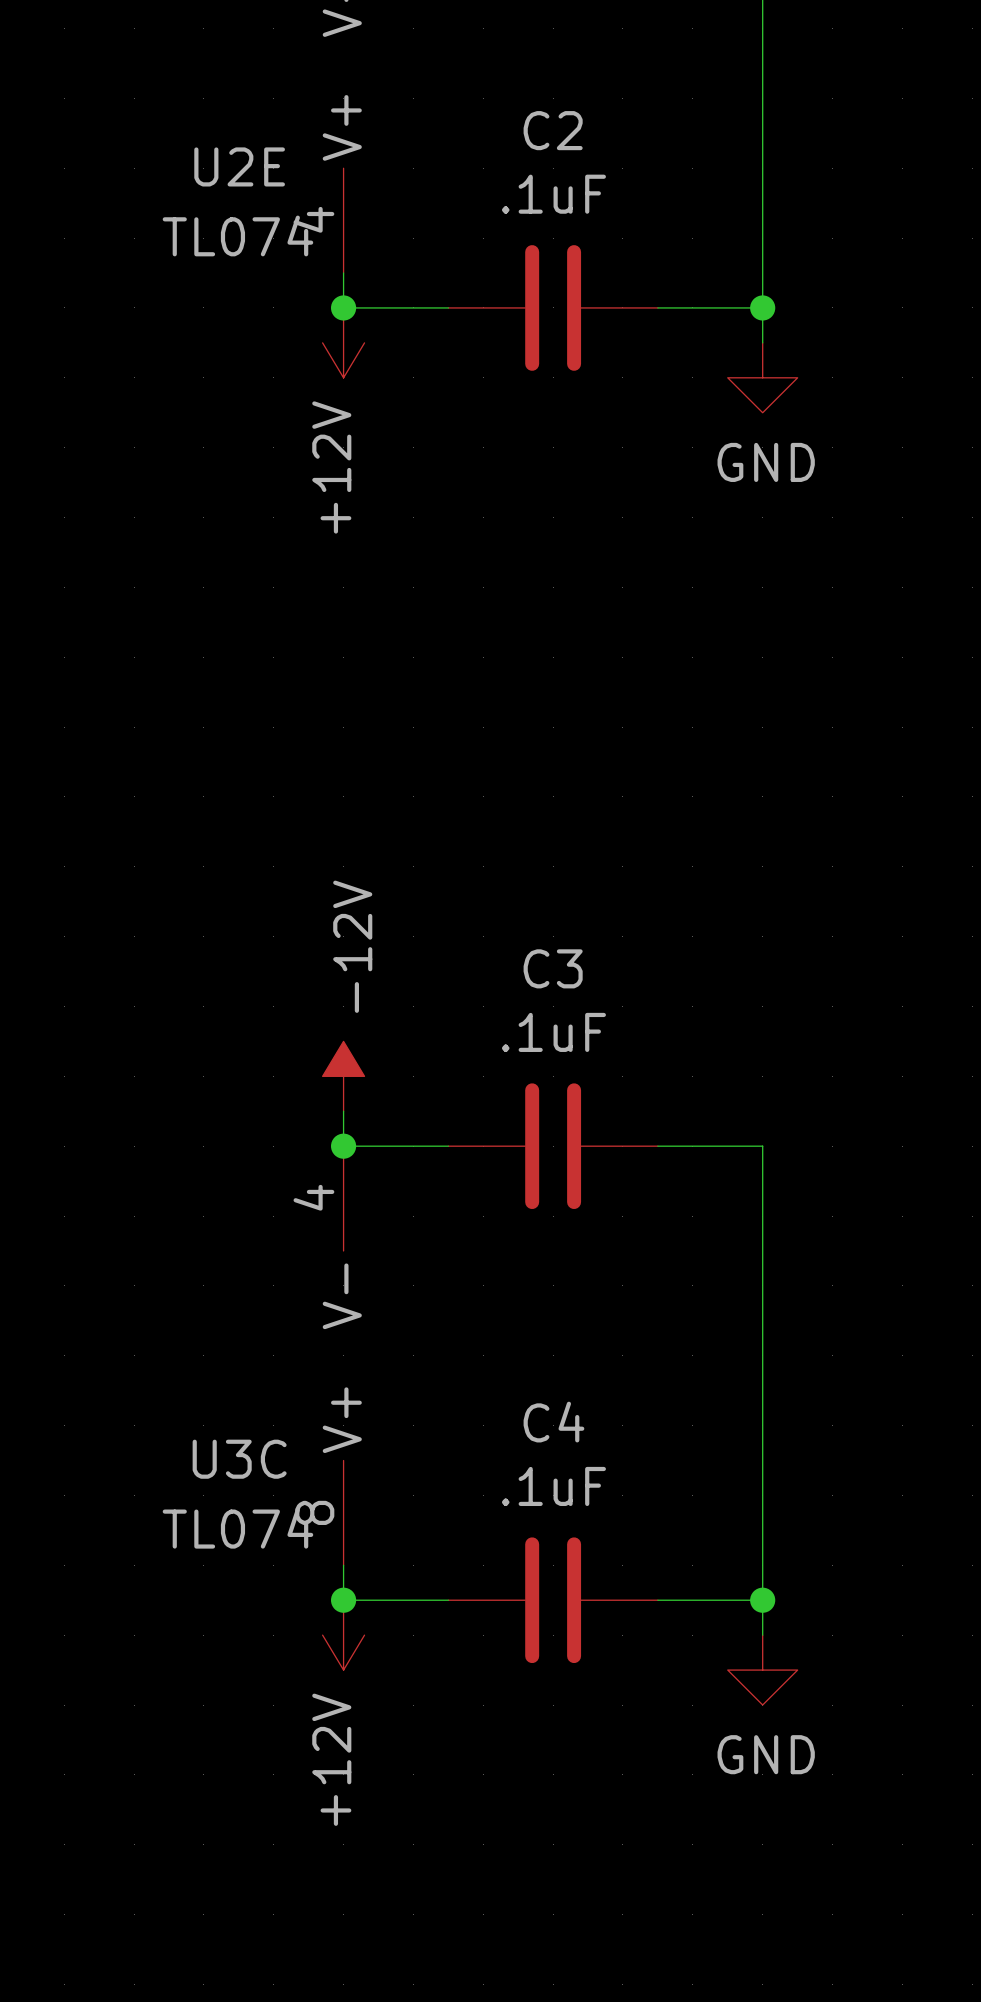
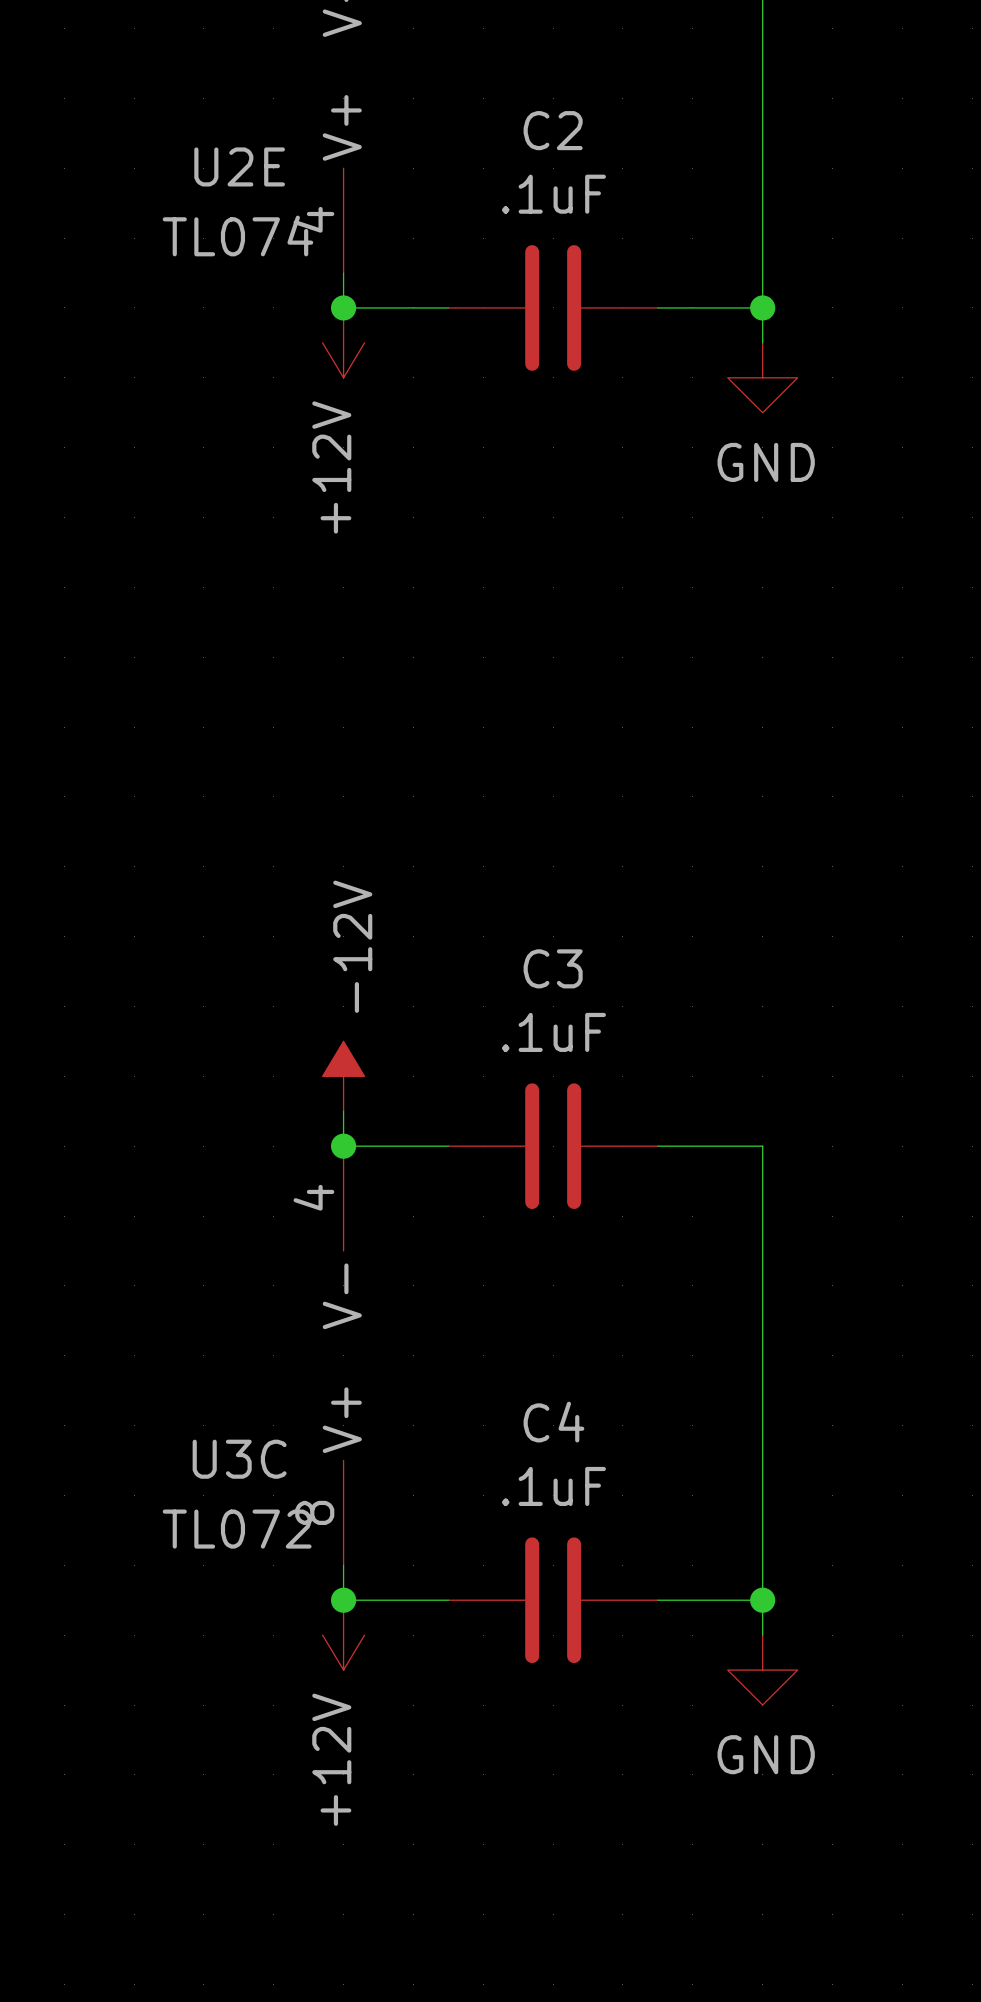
U3C value: TL074 (237, 1528) -> TL072 (237, 1529)

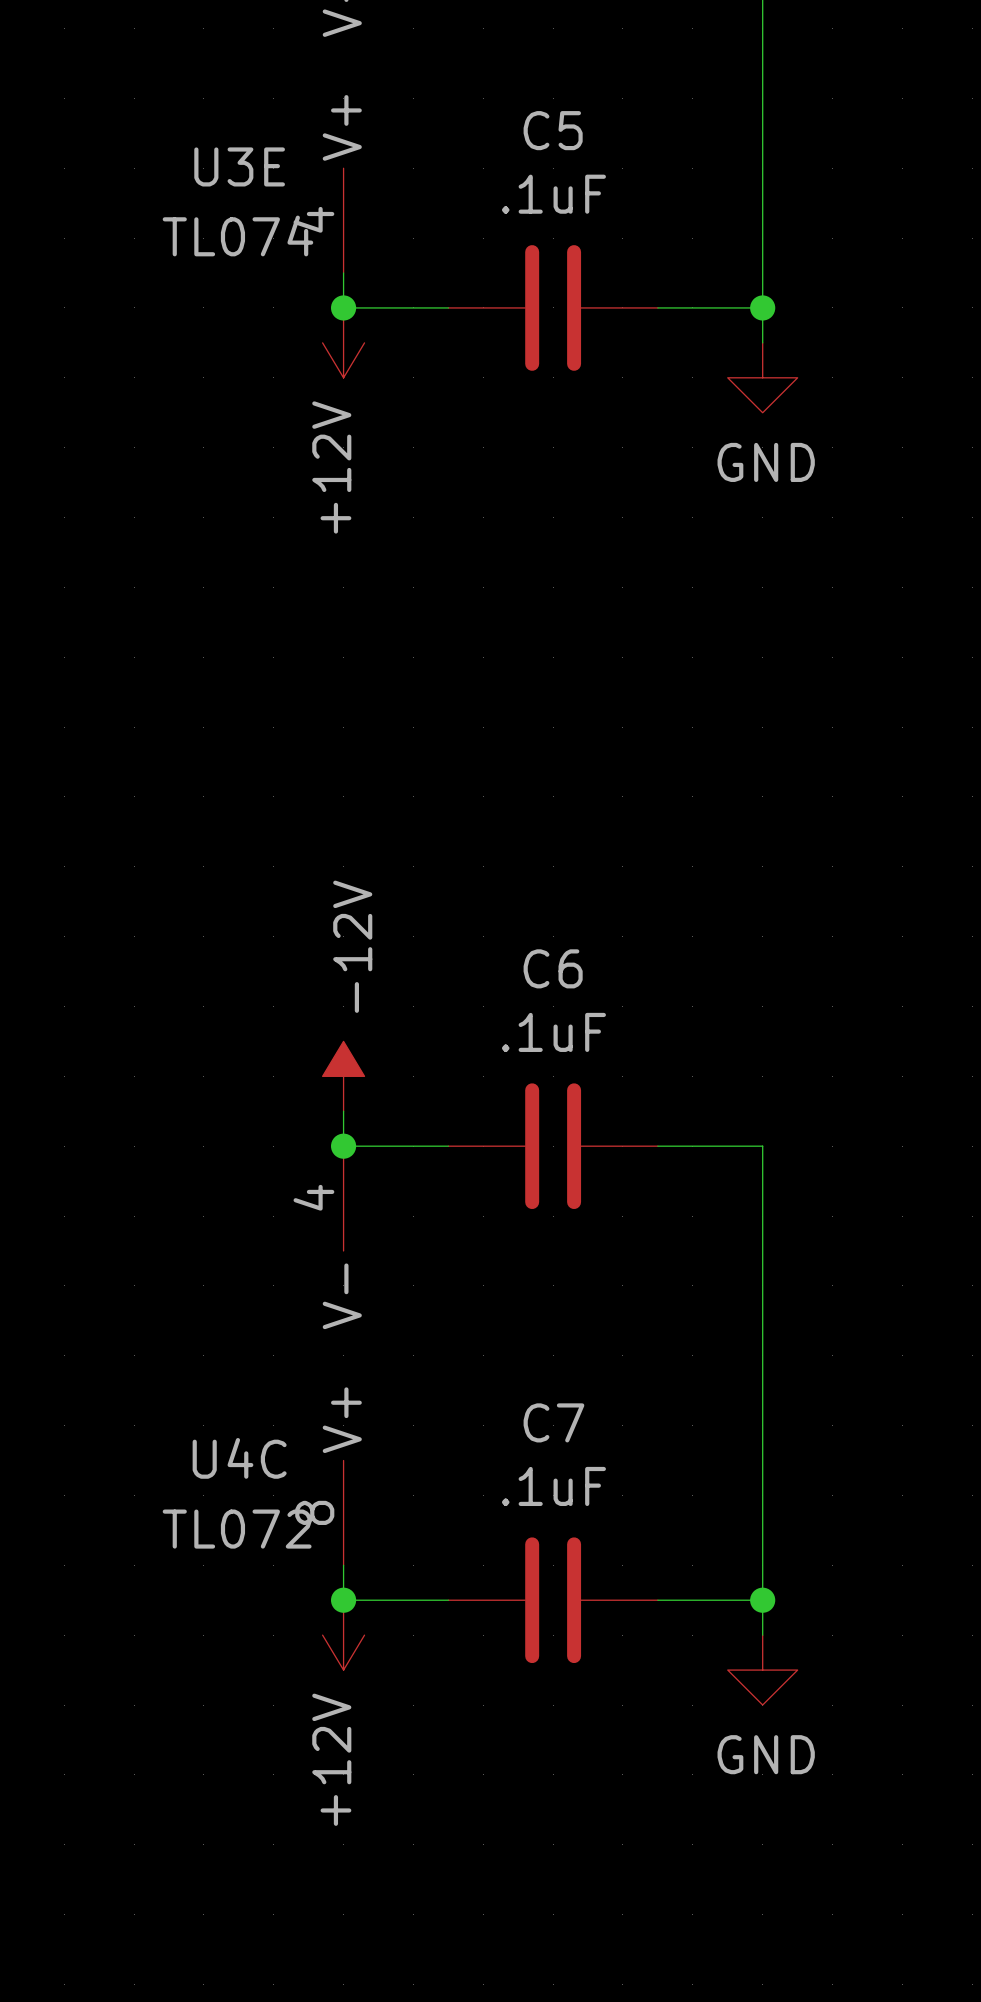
C2 name: C2 (553, 130) -> C5 (553, 130)
U2E name: U2E (239, 166) -> U3E (239, 166)
C3 name: C3 (553, 968) -> C6 (553, 968)
C4 name: C4 (553, 1422) -> C7 (553, 1422)
U3C name: U3C (239, 1459) -> U4C (239, 1458)

